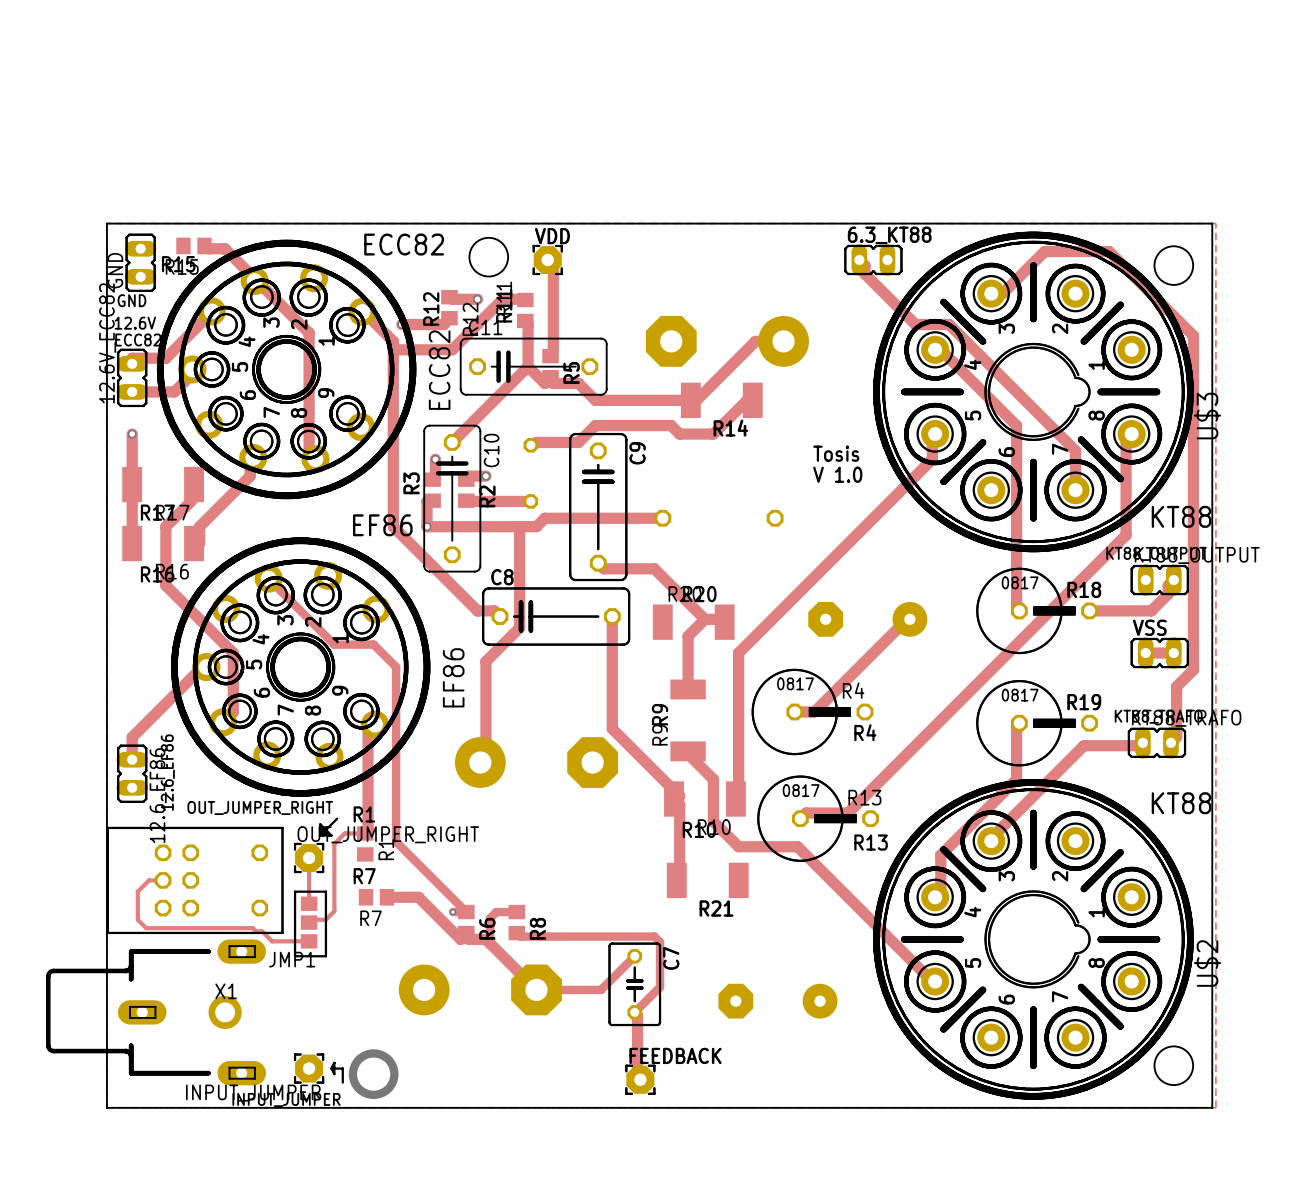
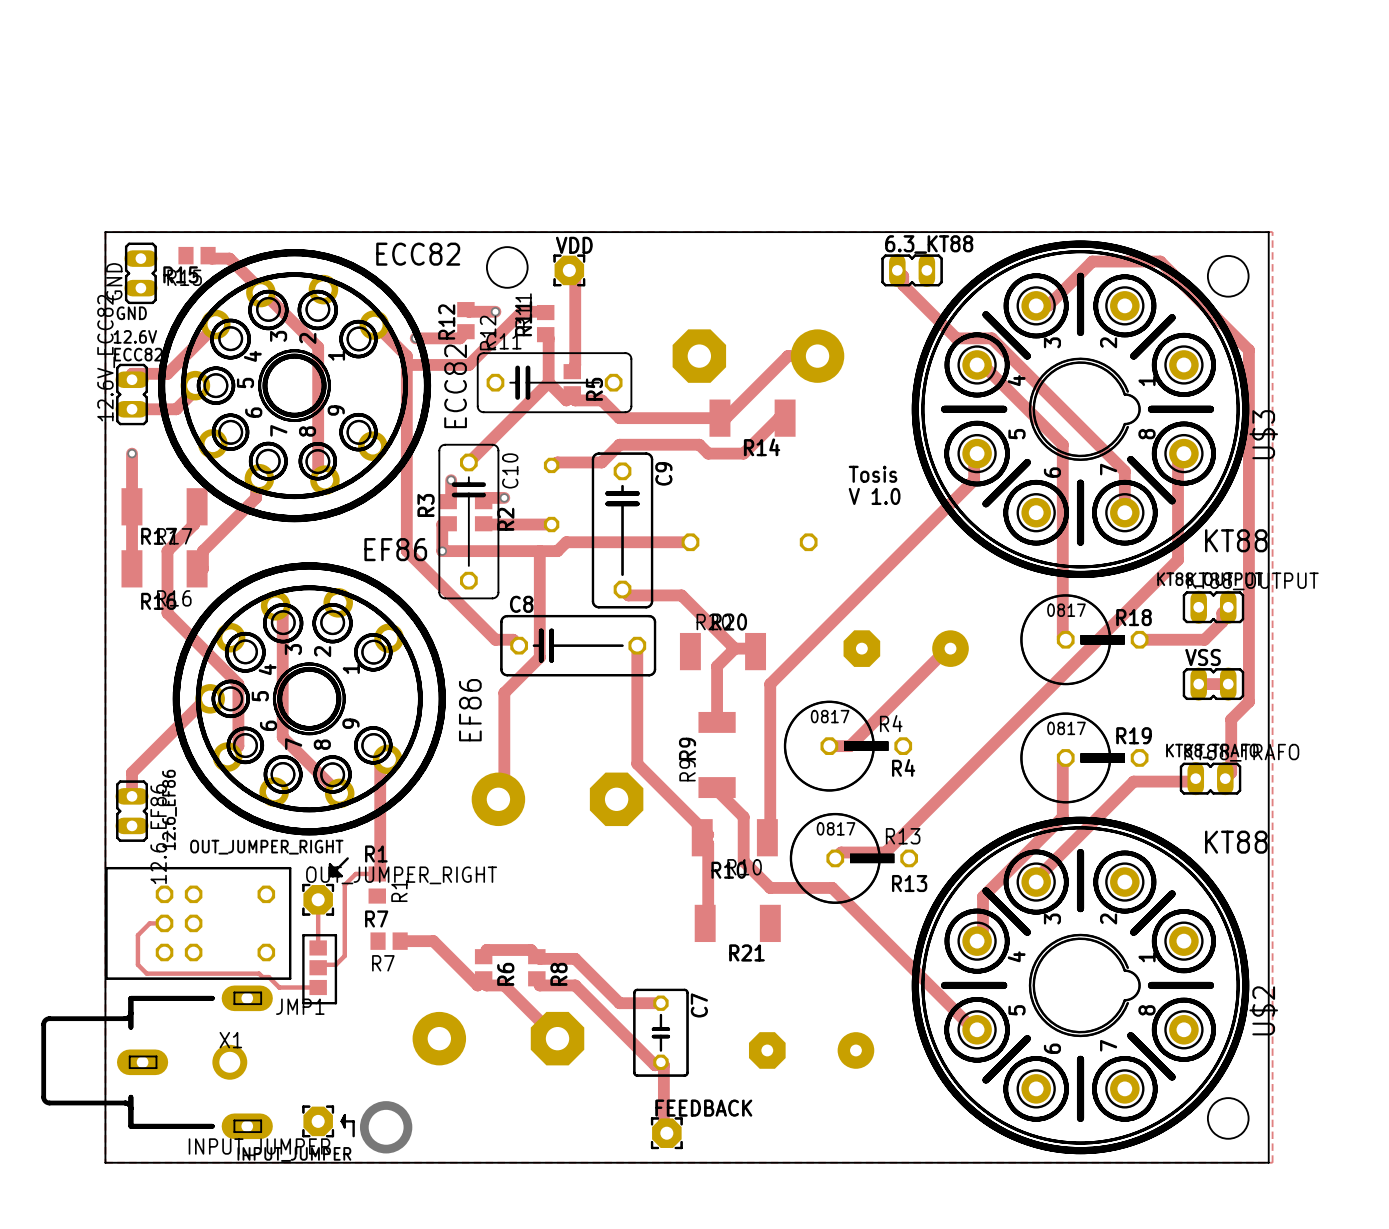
track: (268, 578) (334, 644) (373, 644) (396, 667) (396, 841) (466, 912) (452, 912) -> (275, 605) (282, 613) (282, 737) (339, 793)
via: (452, 912) -> none
track: (516, 912) (496, 912) (490, 918) (490, 943) -> none
track: (516, 933) (520, 936) (654, 936) (660, 942) (660, 987) (634, 1012) -> (536, 978) (539, 985) (575, 985) (655, 1065) (660, 1062) (663, 1065)
track: (634, 956) (601, 989) (536, 989) -> (660, 1003) (619, 1003) (575, 958) (539, 958) (530, 950) (486, 950) (483, 956)

